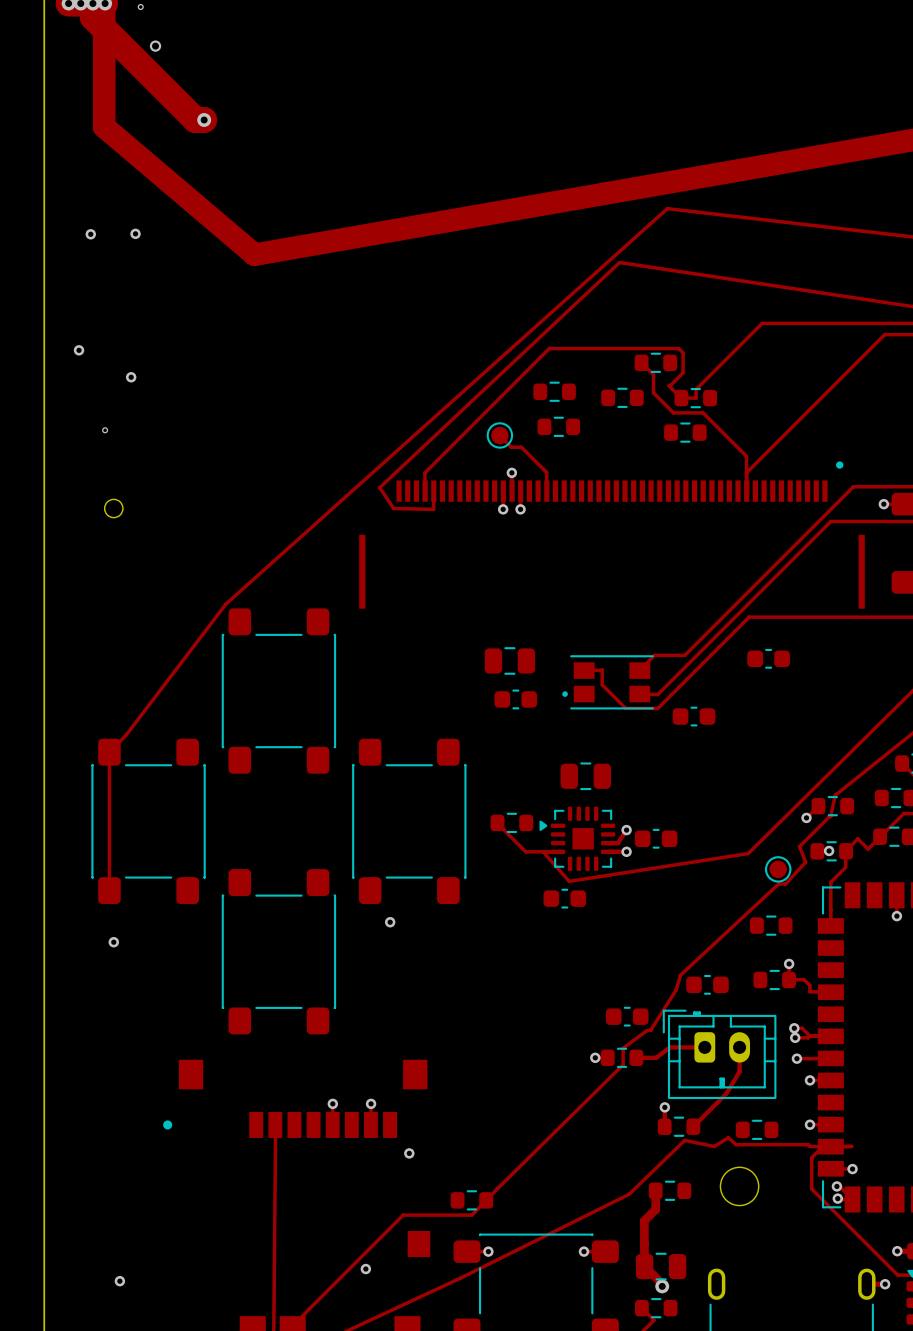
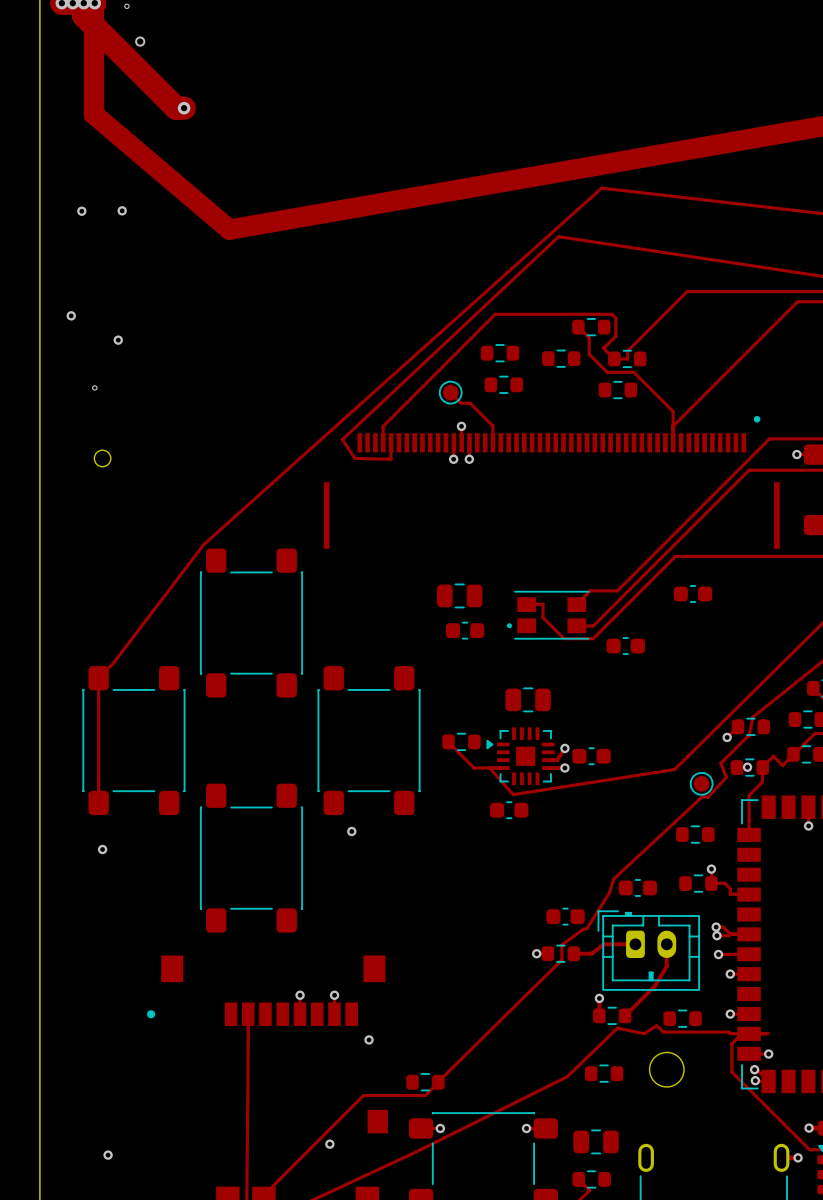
track: (655, 1190) (655, 1209) (644, 1220) (644, 1266) (662, 1283) (662, 1286) -> none
via: (662, 1286) -> none

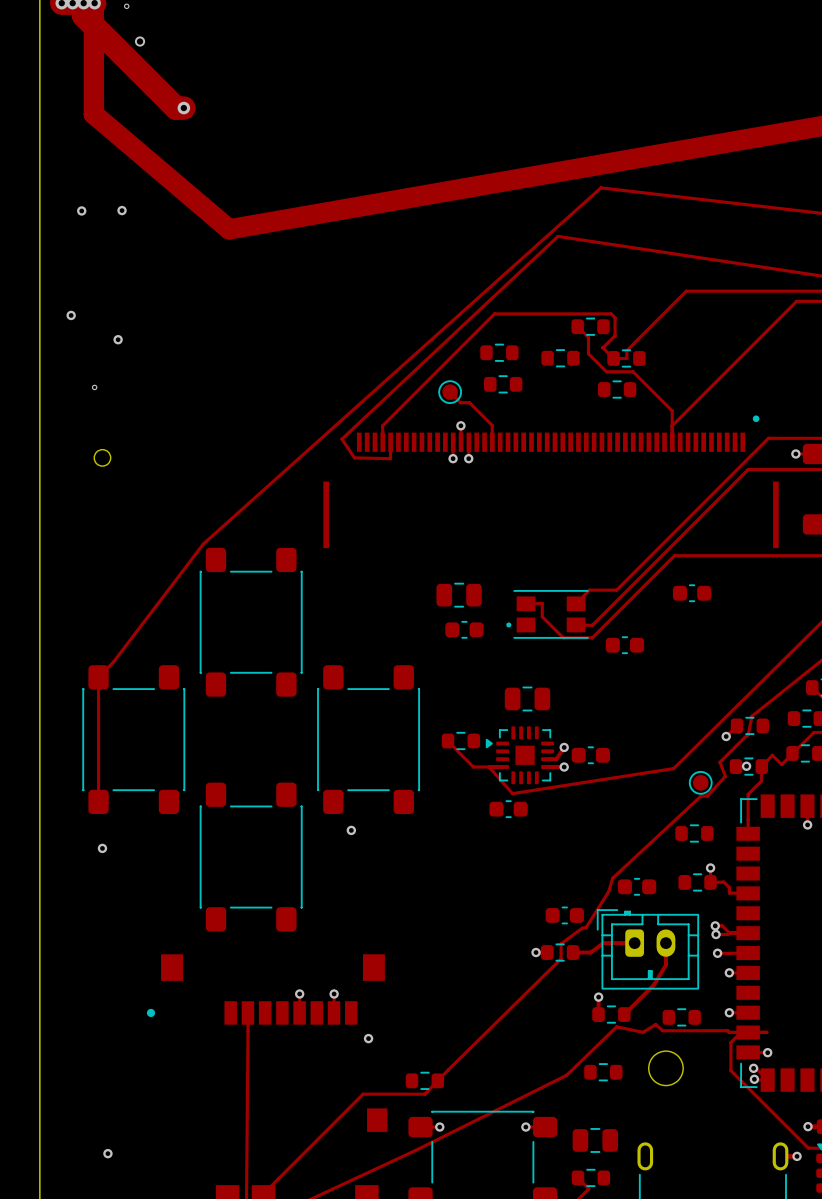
via: (329, 1144) -> none

